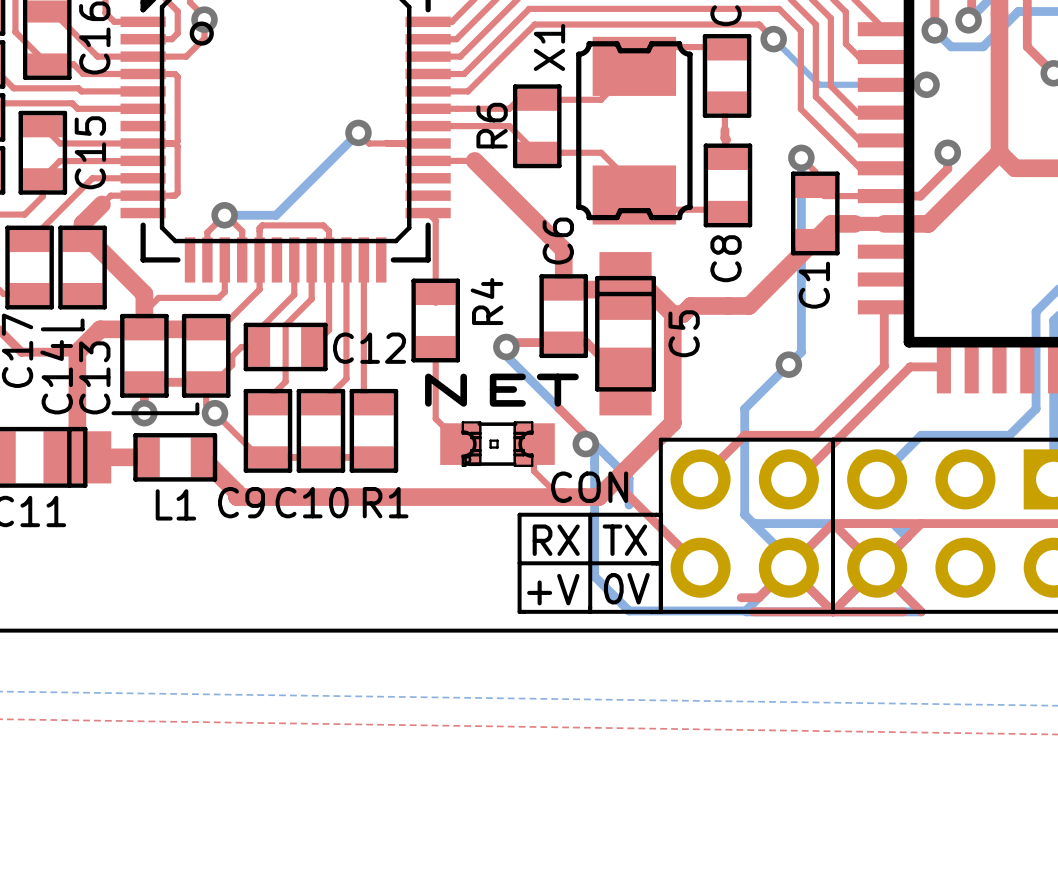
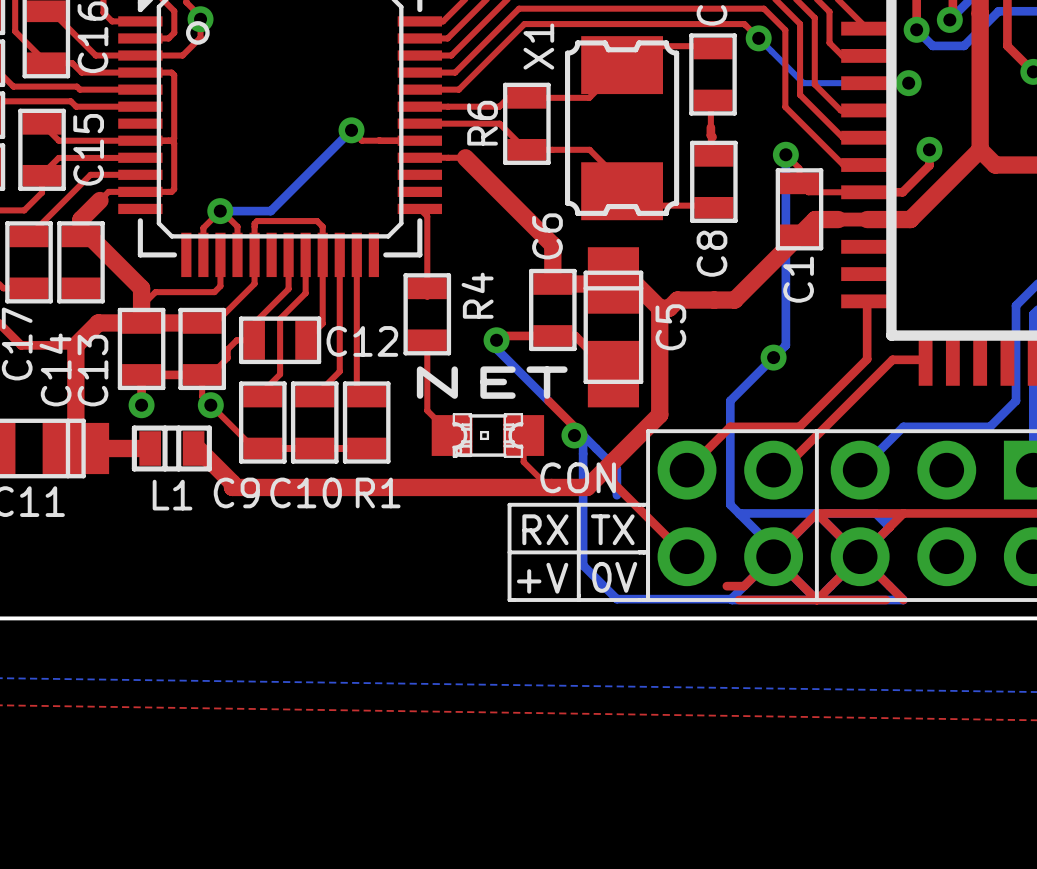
line: (82, 320) (82, 329) (42, 329) -> none
line: (197, 404) (197, 413) (113, 413) -> none
L1 footprint: [133, 433, 218, 482] -> [131, 425, 212, 472]

